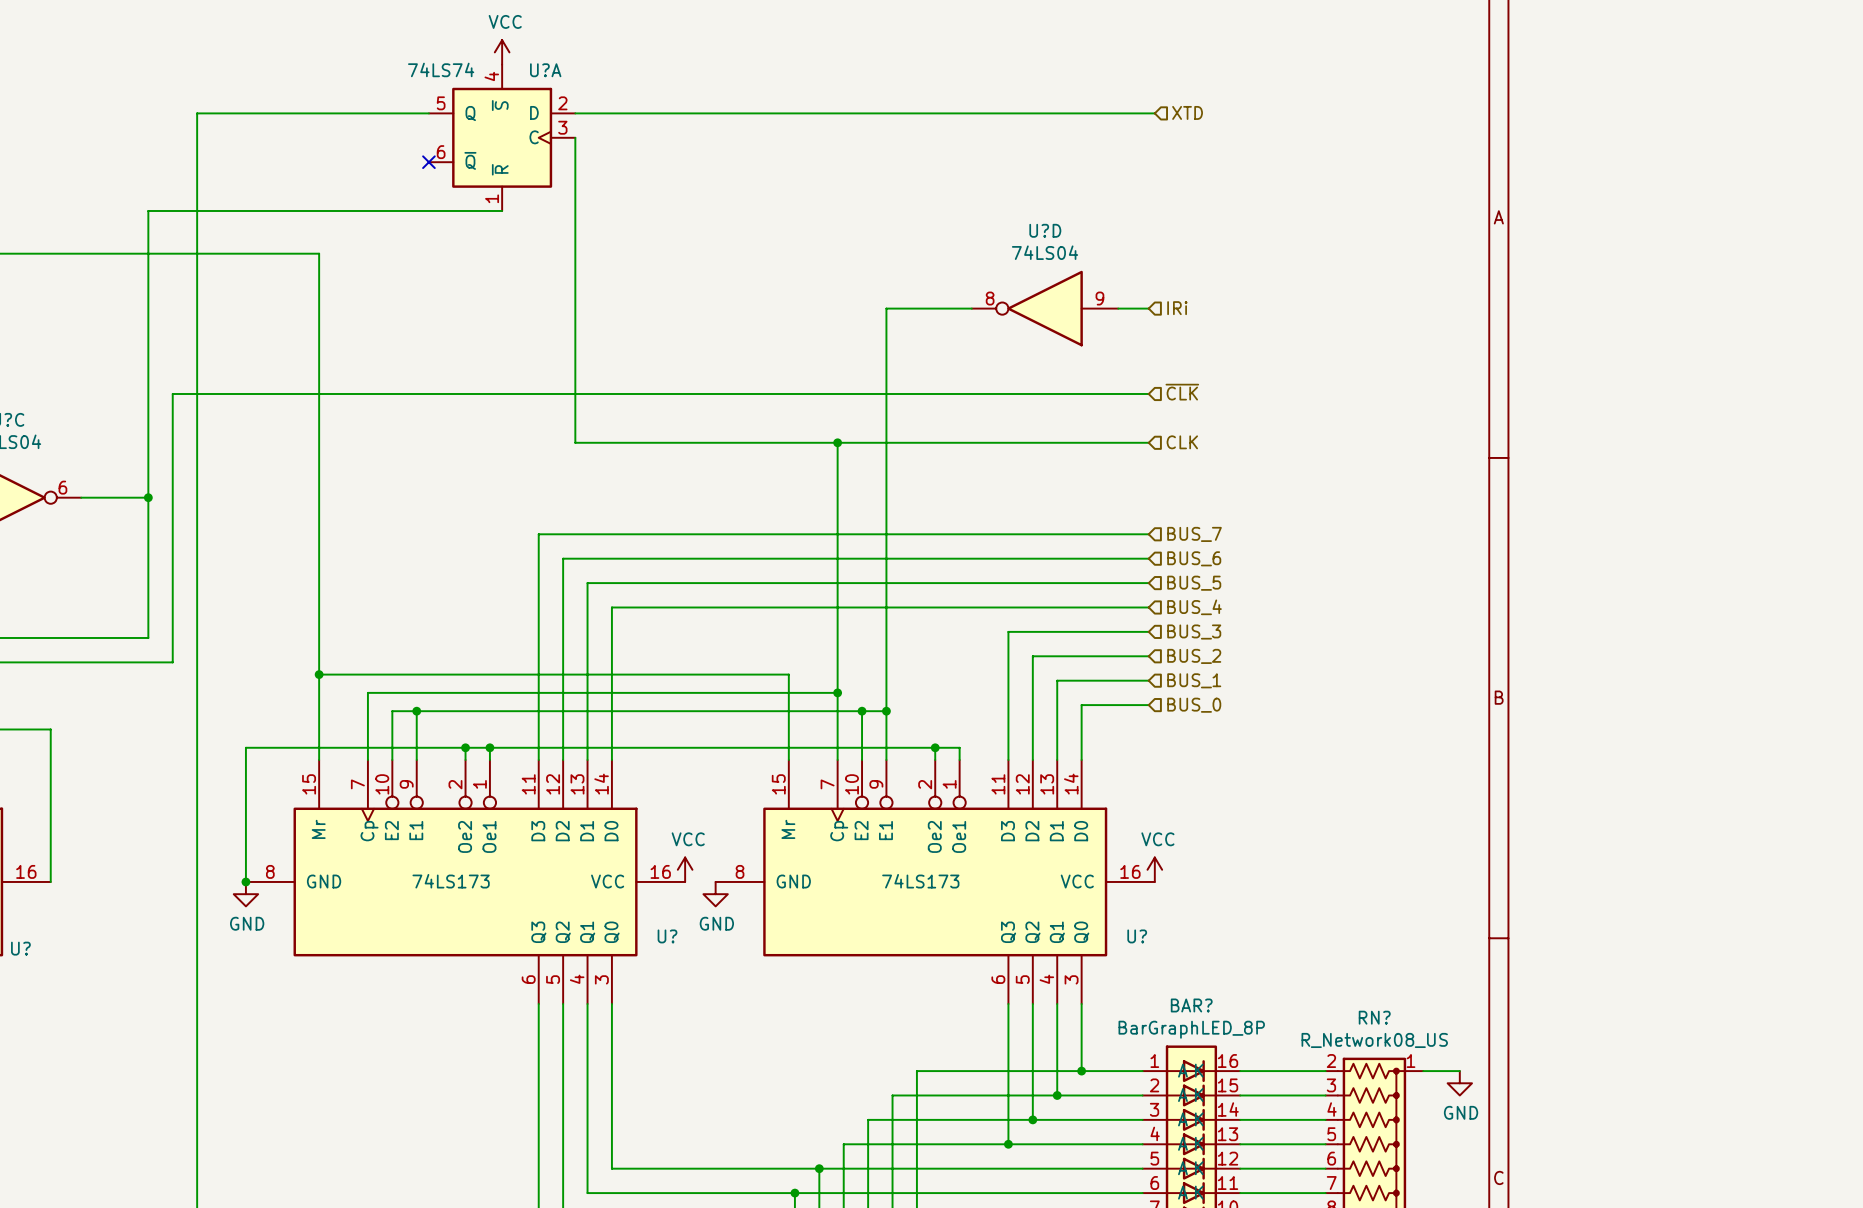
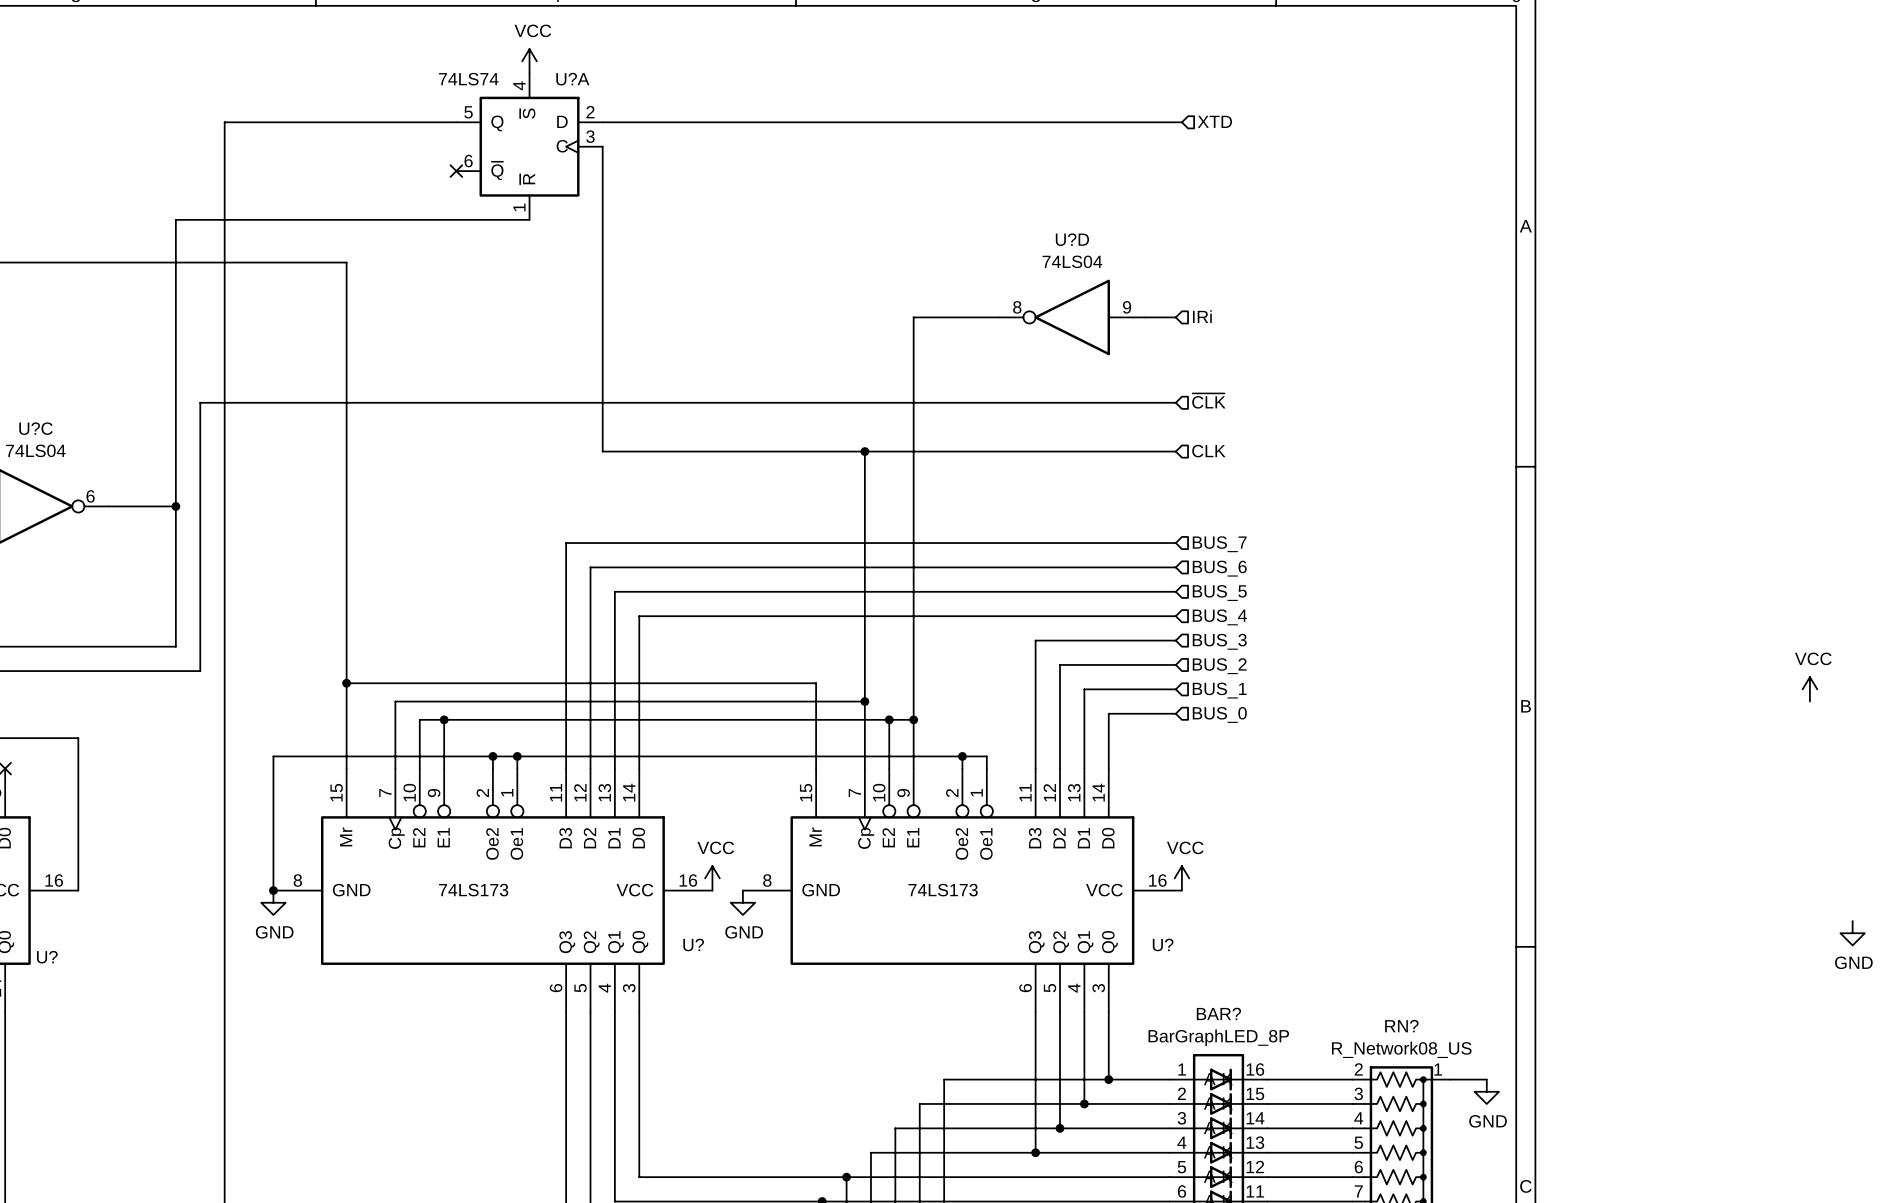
power symbol: none -> VCC (1809, 689)
power symbol: none -> GND (1852, 933)

